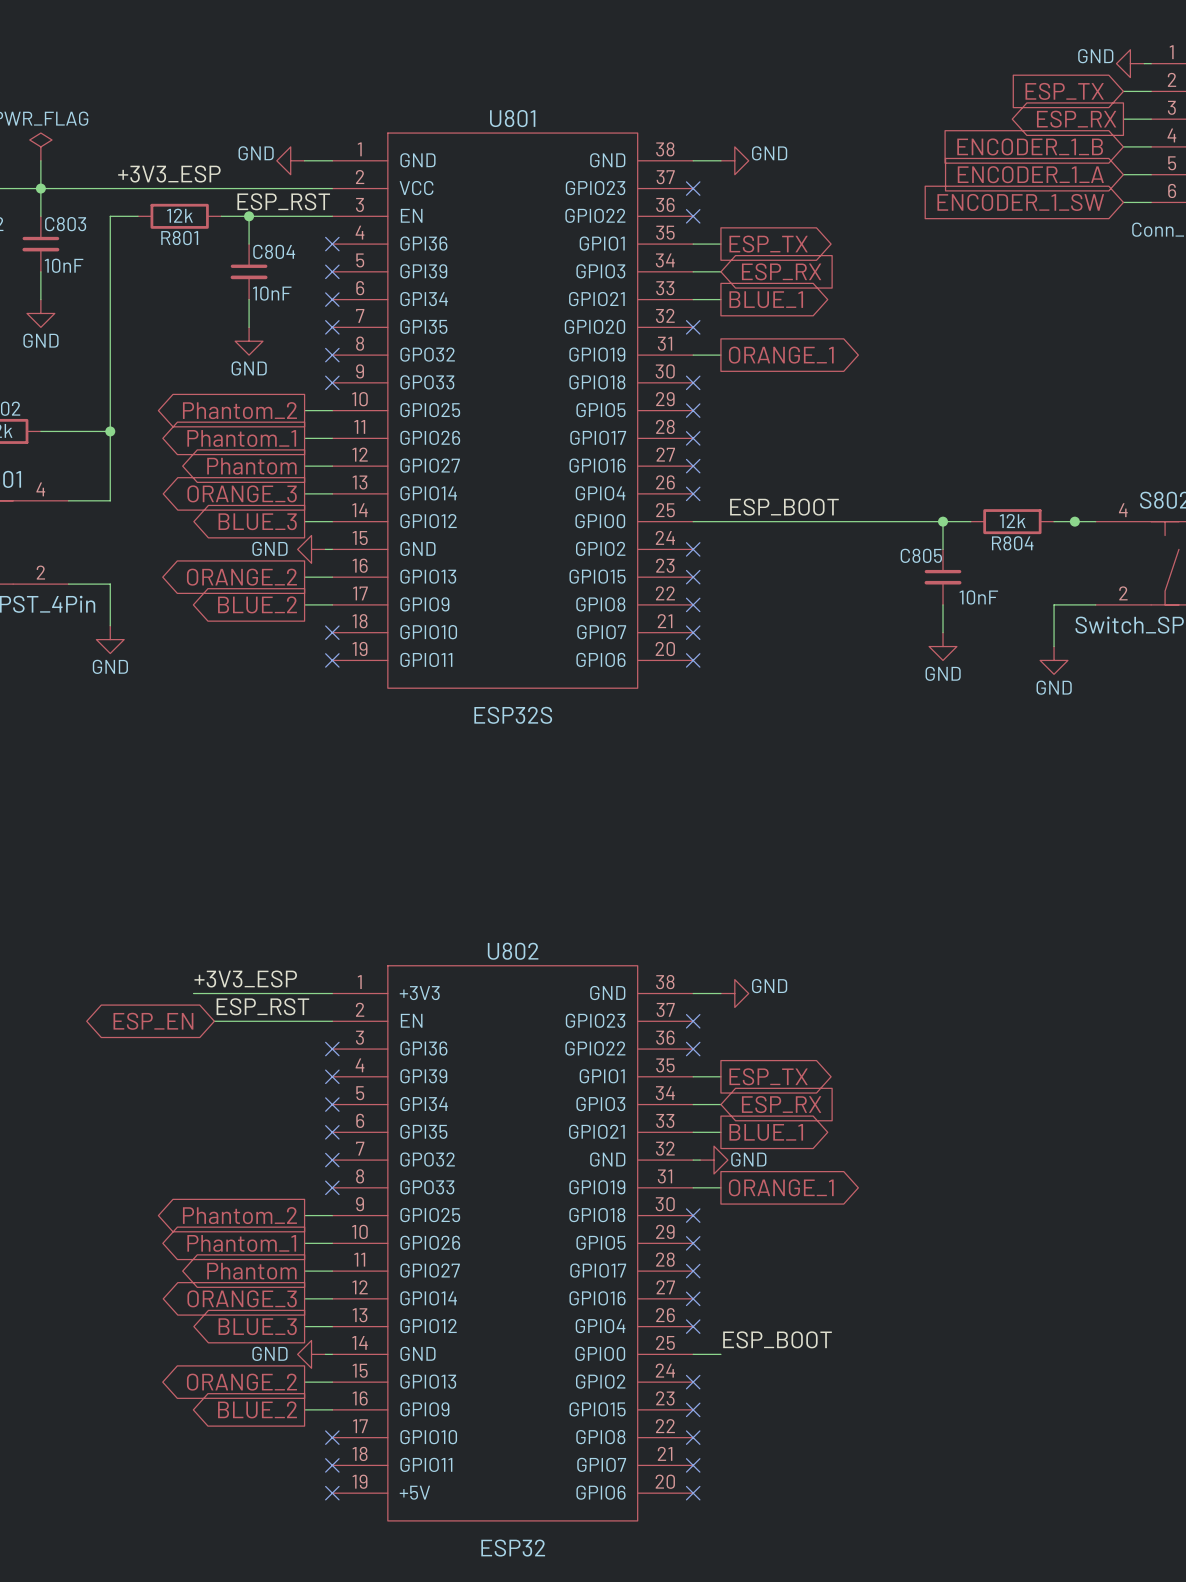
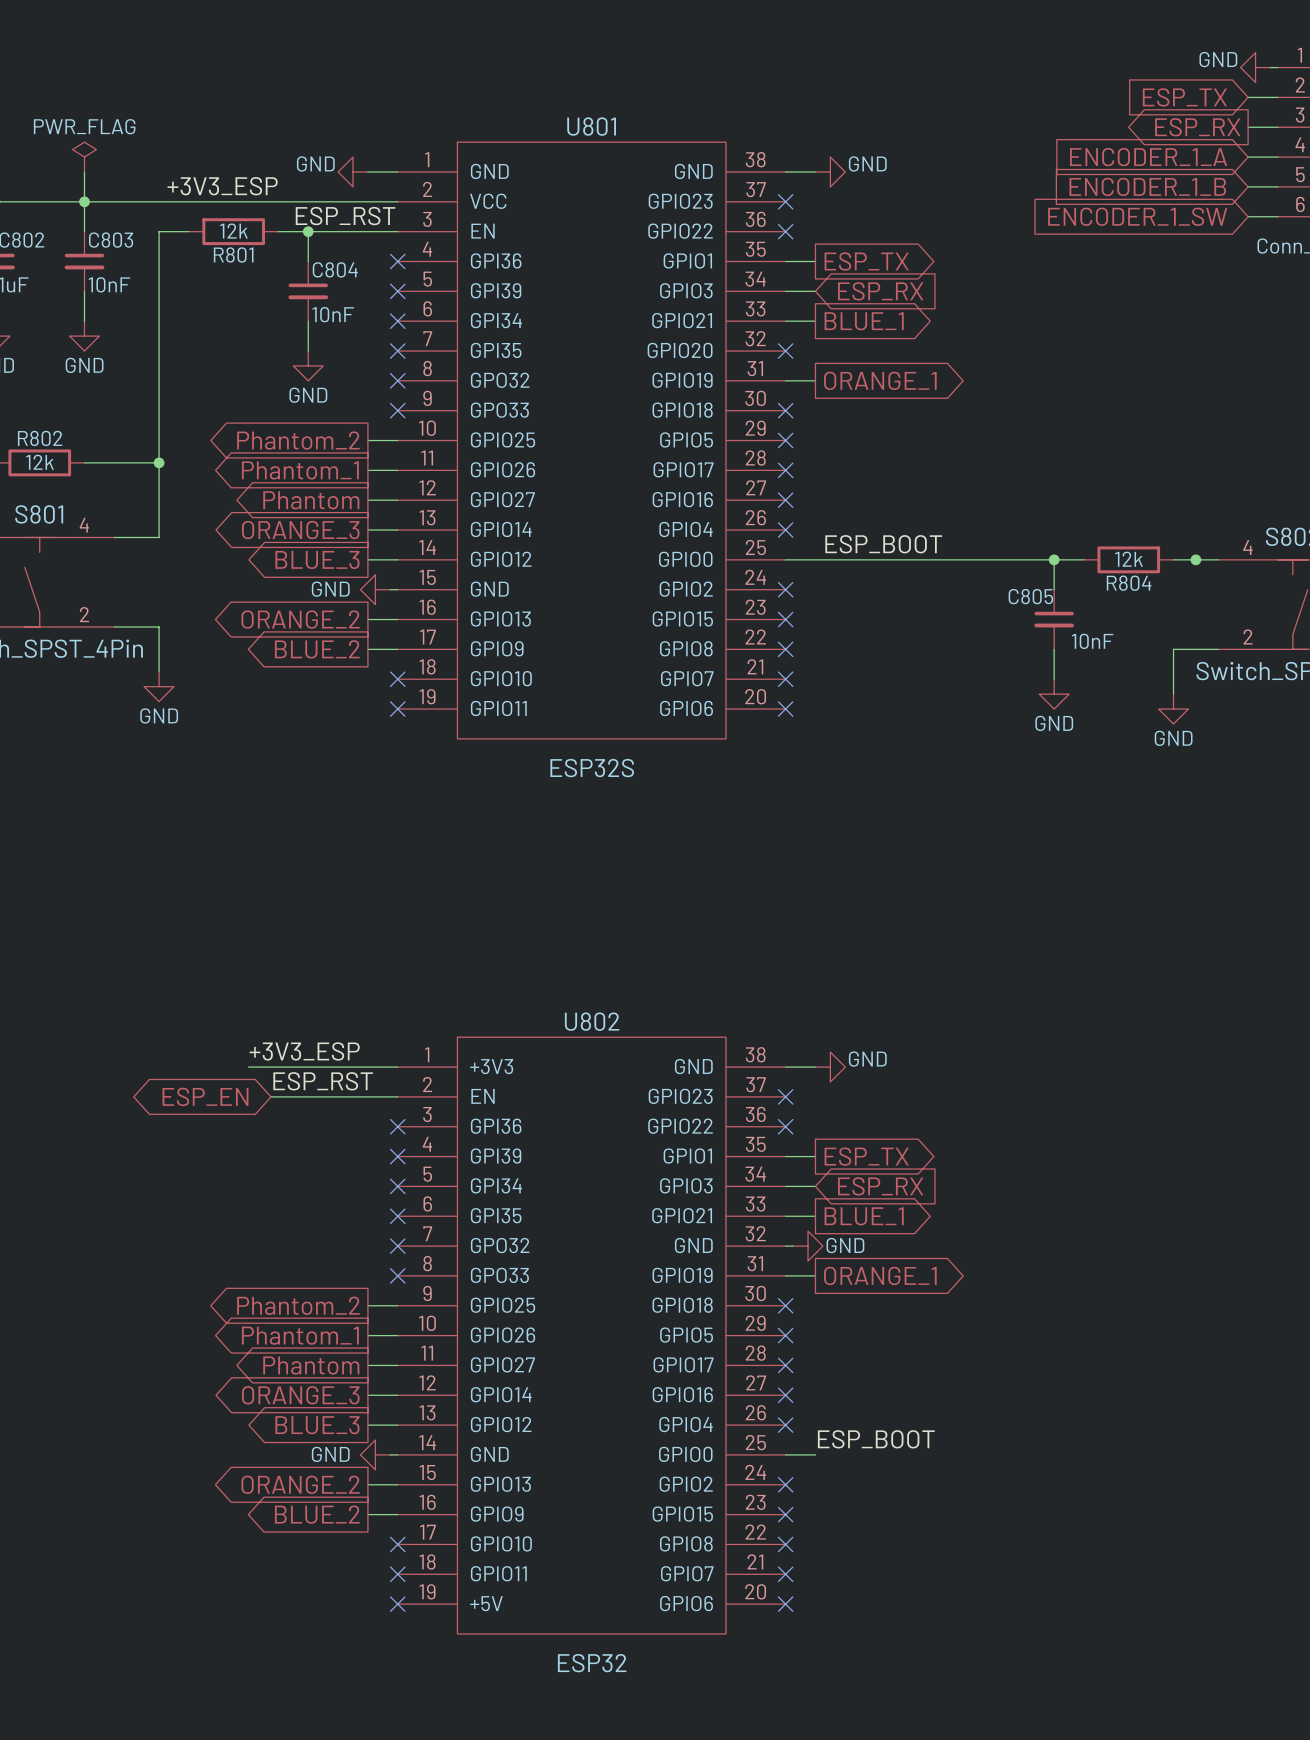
global label: ENCODER_1_B (1030, 146) -> ENCODER_1_A (1148, 157)
global label: ENCODER_1_A (1030, 174) -> ENCODER_1_B (1147, 186)

